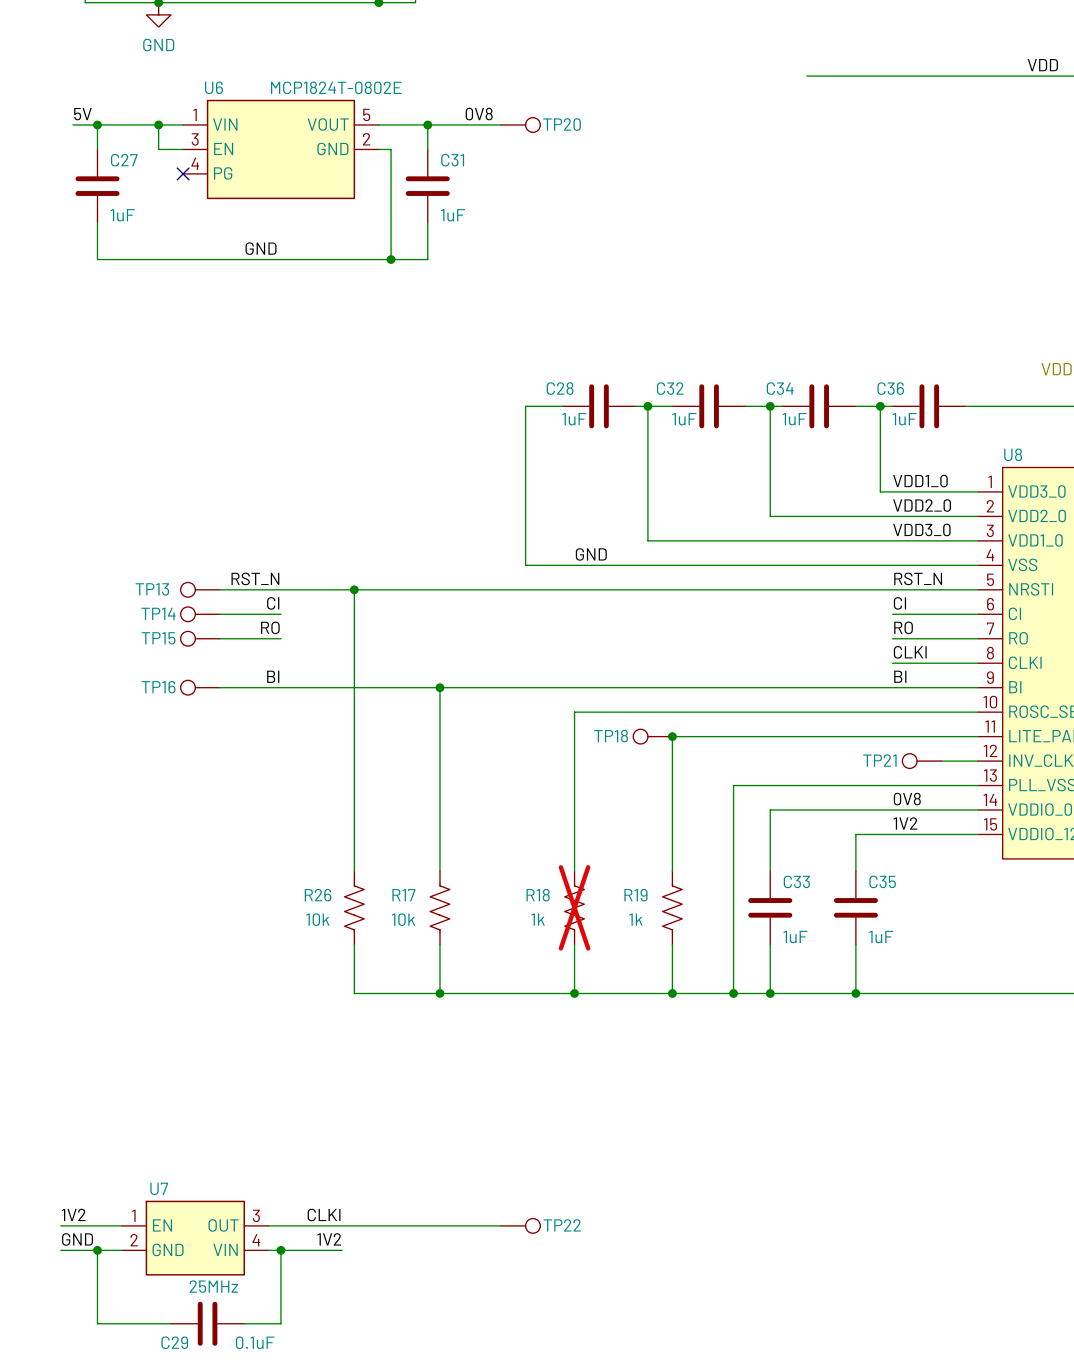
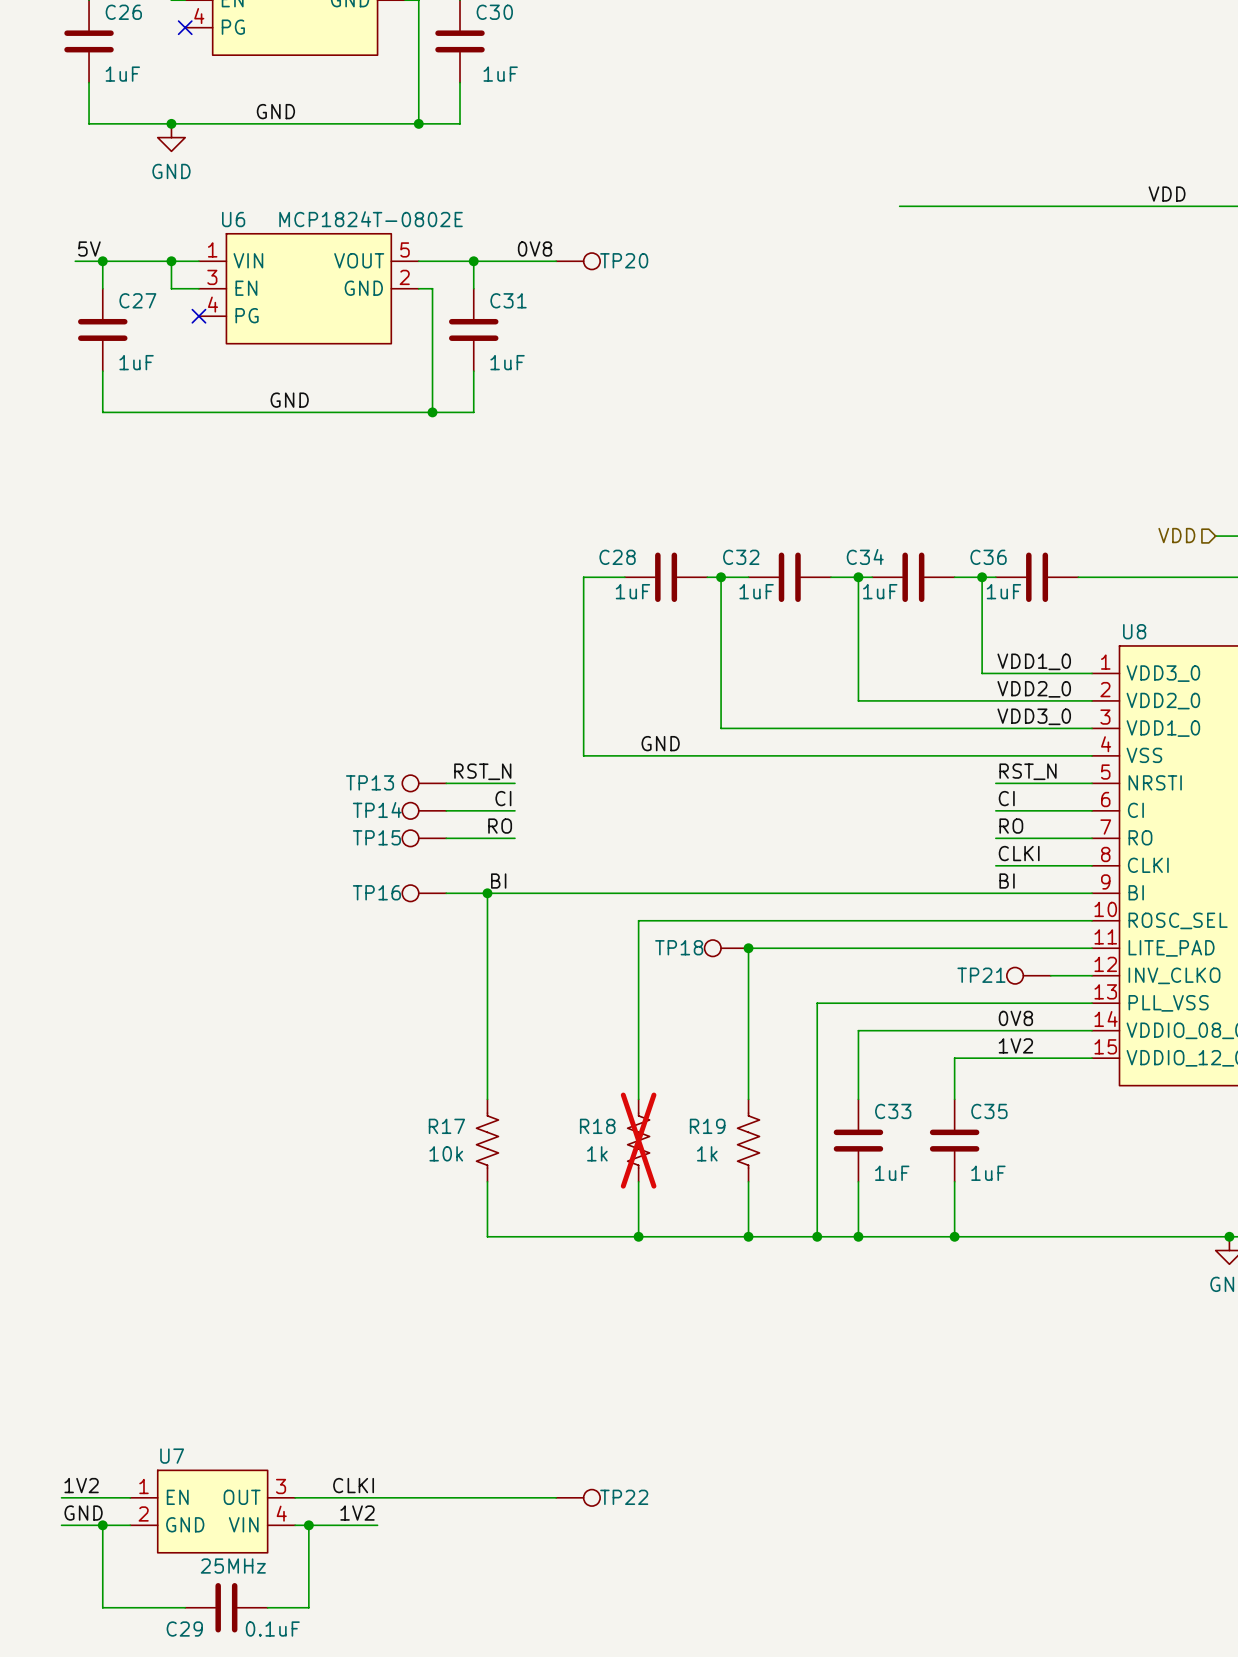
label position: RST_N (255, 578) -> RST_N (482, 771)
TP13 position: (200, 589) -> (424, 783)
wire: (219, 589) (403, 589) -> none
wire: (354, 589) (354, 871) -> none
junction: (354, 589) -> none
wire: (464, 589) (892, 589) -> none
label position: CI (273, 603) -> CI (503, 798)
TP14 position: (200, 614) -> (424, 810)
wire: (219, 614) (280, 614) -> (446, 810) (514, 810)
label position: RO (270, 627) -> RO (500, 826)
TP15 position: (200, 638) -> (424, 838)
wire: (219, 638) (280, 638) -> (446, 838) (514, 838)
label position: BI (273, 676) -> BI (498, 881)
TP16 position: (200, 687) -> (424, 893)
wire: (219, 687) (403, 687) -> none
R26: 10k (354, 907) -> none
wire: (354, 944) (354, 993) (439, 993) -> none
junction: (439, 993) -> none

